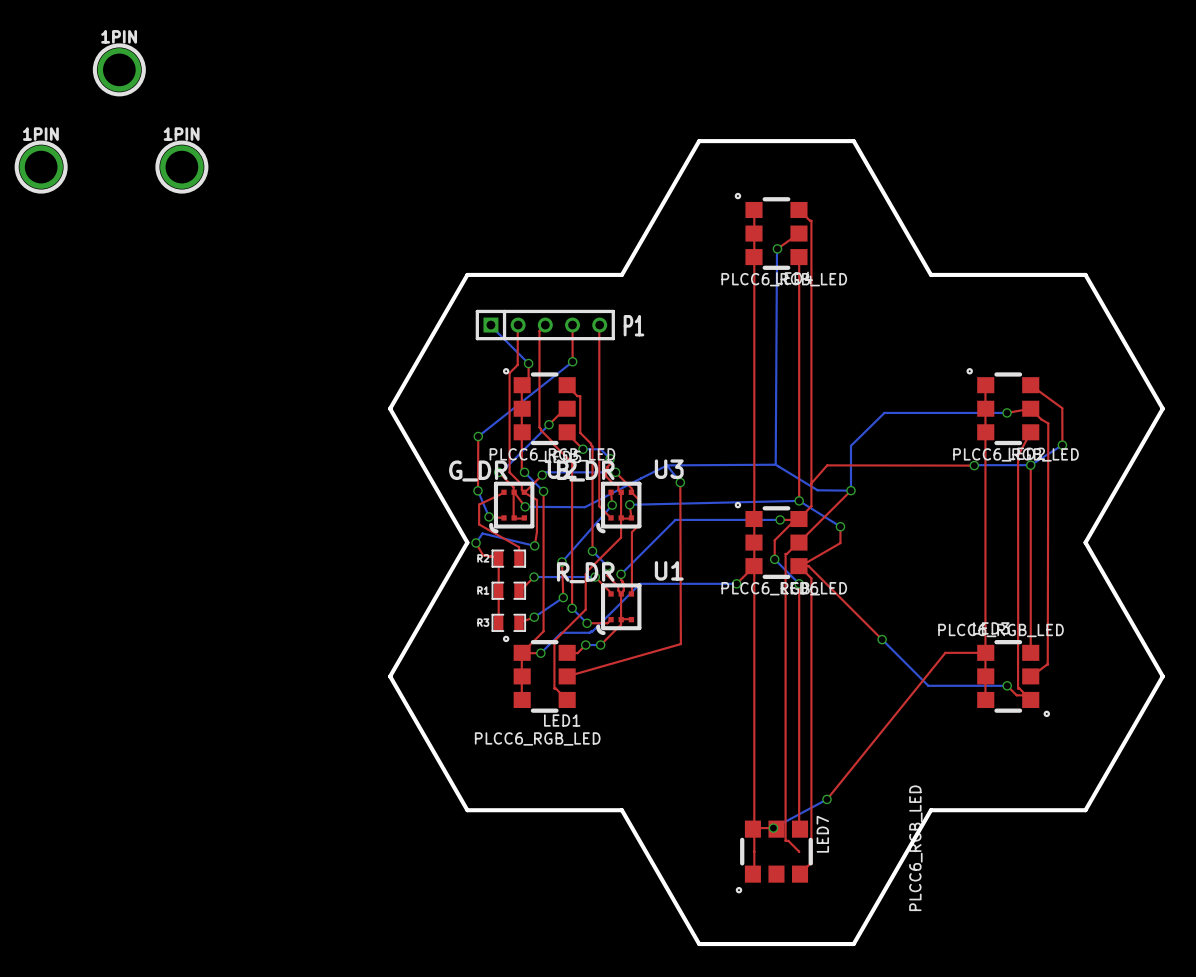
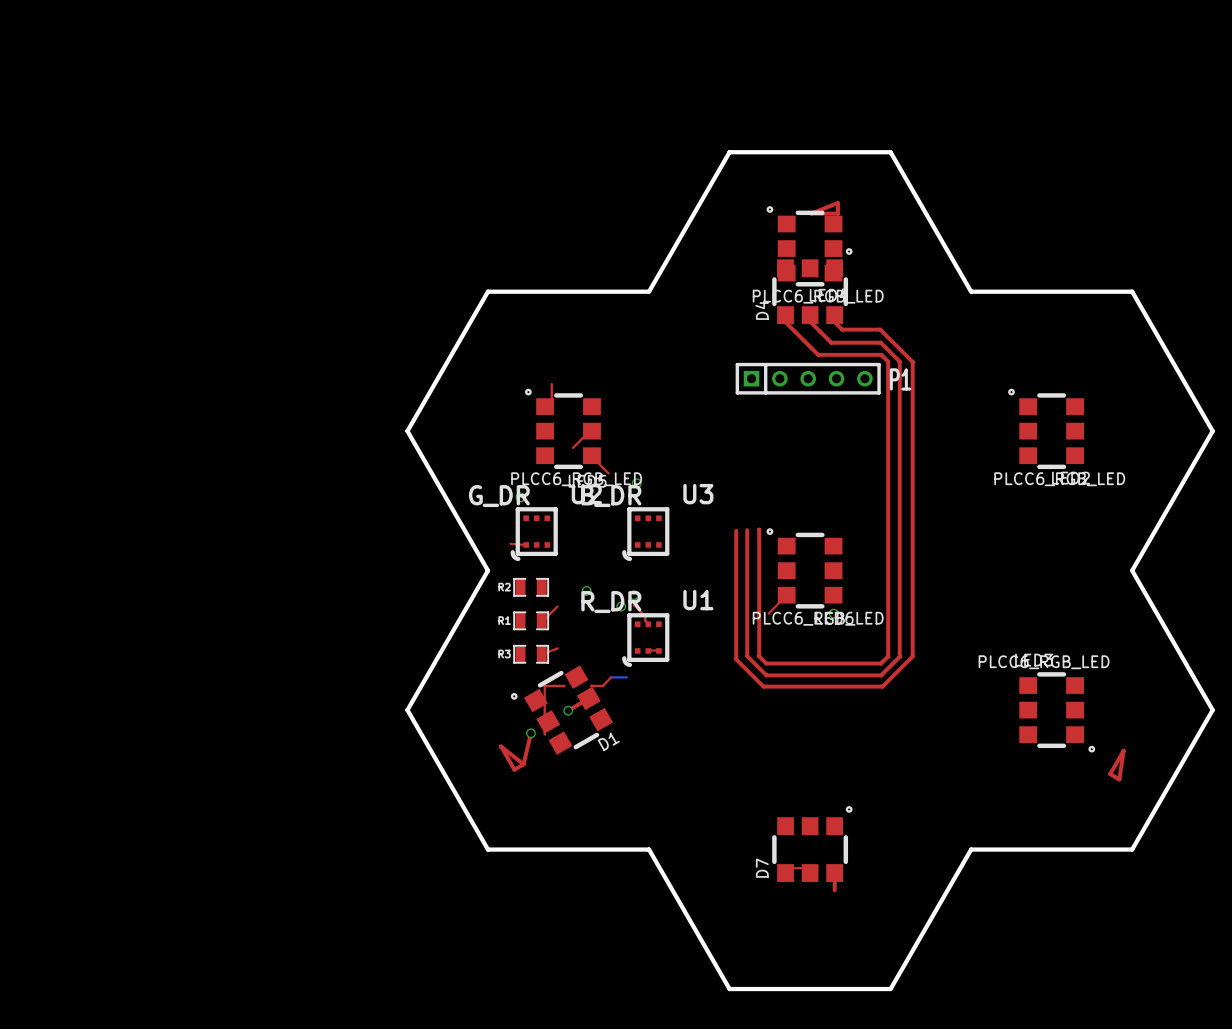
1PIN: (119, 69) -> none
1PIN: (41, 167) -> none
1PIN: (181, 167) -> none
top track: none -> (837, 203) (837, 213) (811, 213) (837, 203)
top track: (753, 209) (753, 875) -> none
top track: (798, 209) (811, 220) (811, 506) (797, 519) (780, 519) -> none
top track: (798, 233) (777, 248) -> none
bottom track: (777, 248) (775, 464) -> none
via: (777, 248) -> none
top track: (798, 257) (799, 500) -> none
D4: none -> (812, 286)
top track: none -> (785, 315) (785, 322) (818, 354) (881, 354) (888, 361) (888, 656) (881, 663) (766, 663) (759, 656) (759, 529)
top track: none -> (810, 315) (810, 321) (831, 342) (880, 342) (899, 361) (899, 656) (881, 675) (766, 675) (747, 656) (747, 530)
top track: none -> (834, 315) (834, 322) (842, 329) (880, 329) (912, 362) (912, 656) (882, 686) (763, 686) (736, 659) (736, 530)
bottom track: (490, 325) (528, 363) -> none
top track: (518, 325) (517, 364) (509, 373) (509, 472) (521, 484) (521, 490) (524, 492) -> none
top track: (545, 325) (539, 330) (539, 427) (572, 462) (572, 608) -> none
P1 position: (545, 325) -> (808, 378)
top track: (572, 325) (572, 361) -> none
top track: (599, 325) (599, 506) (611, 517) -> none
bottom track: (572, 361) (478, 436) -> none
via: (572, 361) -> none
via: (528, 363) -> none
top track: (522, 385) (521, 469) (524, 472) -> none
top track: (567, 385) (577, 396) (580, 396) (580, 432) (592, 446) (592, 551) -> none
top track: (985, 385) (985, 699) -> none
top track: (1030, 385) (1062, 408) (1062, 445) -> none
top track: (1007, 412) (1030, 408) (1048, 423) (1047, 664) (1030, 676) -> none
bottom track: (1007, 412) (884, 412) (850, 445) (850, 490) (817, 490) (775, 464) -> none
via: (1007, 412) -> none
bottom track: (549, 424) (501, 472) (498, 472) -> none
via: (549, 424) -> none
top track: (1030, 432) (1018, 455) (1018, 688) (1030, 699) -> none
top track: (478, 436) (477, 490) -> none
via: (478, 436) -> none
bottom track: (1062, 445) (1030, 465) (974, 465) -> none
via: (1062, 445) -> none
bottom track: (582, 449) (600, 449) (610, 458) -> none
via: (582, 449) -> none
top track: (610, 458) (610, 464) (606, 469) (606, 476) (614, 484) (618, 484) (618, 490) (621, 492) -> none
bottom track: (775, 464) (667, 465) -> none
top track: (974, 465) (827, 465) (811, 483) -> none
via: (974, 465) -> none
top track: (1030, 465) (1030, 652) -> none
via: (1030, 465) -> none
top track: (498, 472) (513, 487) (513, 518) -> none
bottom track: (524, 472) (543, 491) -> none
via: (524, 472) -> none
top track: (615, 472) (631, 488) (631, 492) -> none
bottom track: (615, 472) (544, 472) (542, 475) -> none
via: (615, 472) -> none
top track: (542, 475) (524, 492) -> none
via: (542, 475) -> none
top track: (680, 482) (680, 644) (567, 676) -> none
bottom track: (680, 482) (667, 465) (584, 507) (525, 506) -> none
via: (680, 482) -> none
bottom track: (477, 490) (489, 516) -> none
via: (477, 490) -> none
top track: (850, 490) (799, 543) (785, 553) (785, 840) (788, 840) (798, 851) -> none
via: (850, 490) -> none
top track: (543, 491) (543, 631) (522, 652) -> none
via: (543, 491) -> none
top track: (504, 492) (479, 504) (479, 524) (519, 547) (519, 558) -> none
top track: (513, 492) (525, 506) -> none
top track: (524, 492) (536, 499) (536, 531) (534, 545) -> none
top track: (611, 492) (612, 505) -> none
top track: (621, 492) (621, 537) (587, 571) (585, 609) (554, 640) (554, 688) (567, 699) -> none
top track: (631, 492) (638, 499) (638, 525) (631, 532) (631, 593) -> none
via: (799, 500) -> none
top track: (629, 504) (631, 518) (621, 517) -> none
bottom track: (629, 504) (799, 500) (840, 526) -> none
via: (629, 504) -> none
bottom track: (612, 505) (562, 562) -> none
via: (612, 505) -> none
via: (525, 506) -> none
via: (489, 516) -> none
top track: (524, 517) (513, 518) -> none
bottom track: (780, 519) (675, 519) (621, 574) -> none
via: (780, 519) -> none
top track: (798, 519) (796, 518) (774, 540) (774, 559) -> none
top track: (840, 526) (840, 543) (800, 566) -> none
via: (840, 526) -> none
top track: (476, 542) (482, 554) (498, 558) (498, 622) -> none
bottom track: (476, 542) (482, 533) (534, 545) -> none
via: (476, 542) -> none
via: (534, 545) -> none
bottom track: (592, 551) (607, 566) -> none
via: (592, 551) -> none
bottom track: (774, 559) (799, 583) -> none
via: (774, 559) -> none
top track: (562, 562) (563, 597) -> none
top track: (799, 566) (808, 566) (882, 639) -> none
top track: (799, 566) (811, 578) (811, 863) (798, 875) -> none
top track: (621, 574) (623, 583) (623, 590) (621, 593) -> none
via: (621, 574) -> none
bottom track: (534, 577) (595, 577) -> none
via: (534, 577) -> none
top track: (595, 577) (611, 593) -> none
bottom track: (736, 583) (640, 583) (592, 631) (561, 632) (540, 653) -> none
via: (736, 583) -> none
top track: (799, 583) (798, 828) -> none
top track: (621, 593) (621, 624) (600, 645) -> none
bottom track: (563, 597) (534, 617) -> none
via: (563, 597) -> none
bottom track: (572, 608) (587, 623) -> none
via: (572, 608) -> none
via: (534, 617) -> none
top track: (611, 619) (607, 623) (587, 623) -> none
via: (587, 623) -> none
bottom track: (882, 639) (928, 685) (1007, 685) -> none
via: (882, 639) -> none
via: (585, 645) -> none
via: (600, 645) -> none
via position: (540, 653) -> (568, 710)
top track: (985, 653) (945, 652) (827, 799) -> none
top track: none -> (588, 698) (568, 710)
LED1: PLCC6_RGB_LED (539, 674) -> none
D1: none -> (561, 710)
top track: (1007, 685) (1016, 695) (1026, 695) -> none
via: (1007, 685) -> none
top track: none -> (530, 733) (523, 764)
via: none -> (530, 733)
top track: none -> (1123, 750) (1110, 774) (1119, 779) (1123, 750)
top track: none -> (523, 764) (514, 769) (501, 746) (523, 764)
bottom track: (827, 799) (773, 828) -> none
via: (827, 799) -> none
D7: none -> (812, 844)
via: (773, 828) -> none
top track: none -> (834, 873) (834, 890)
LED7: PLCC6_RGB_LED (774, 856) -> none

